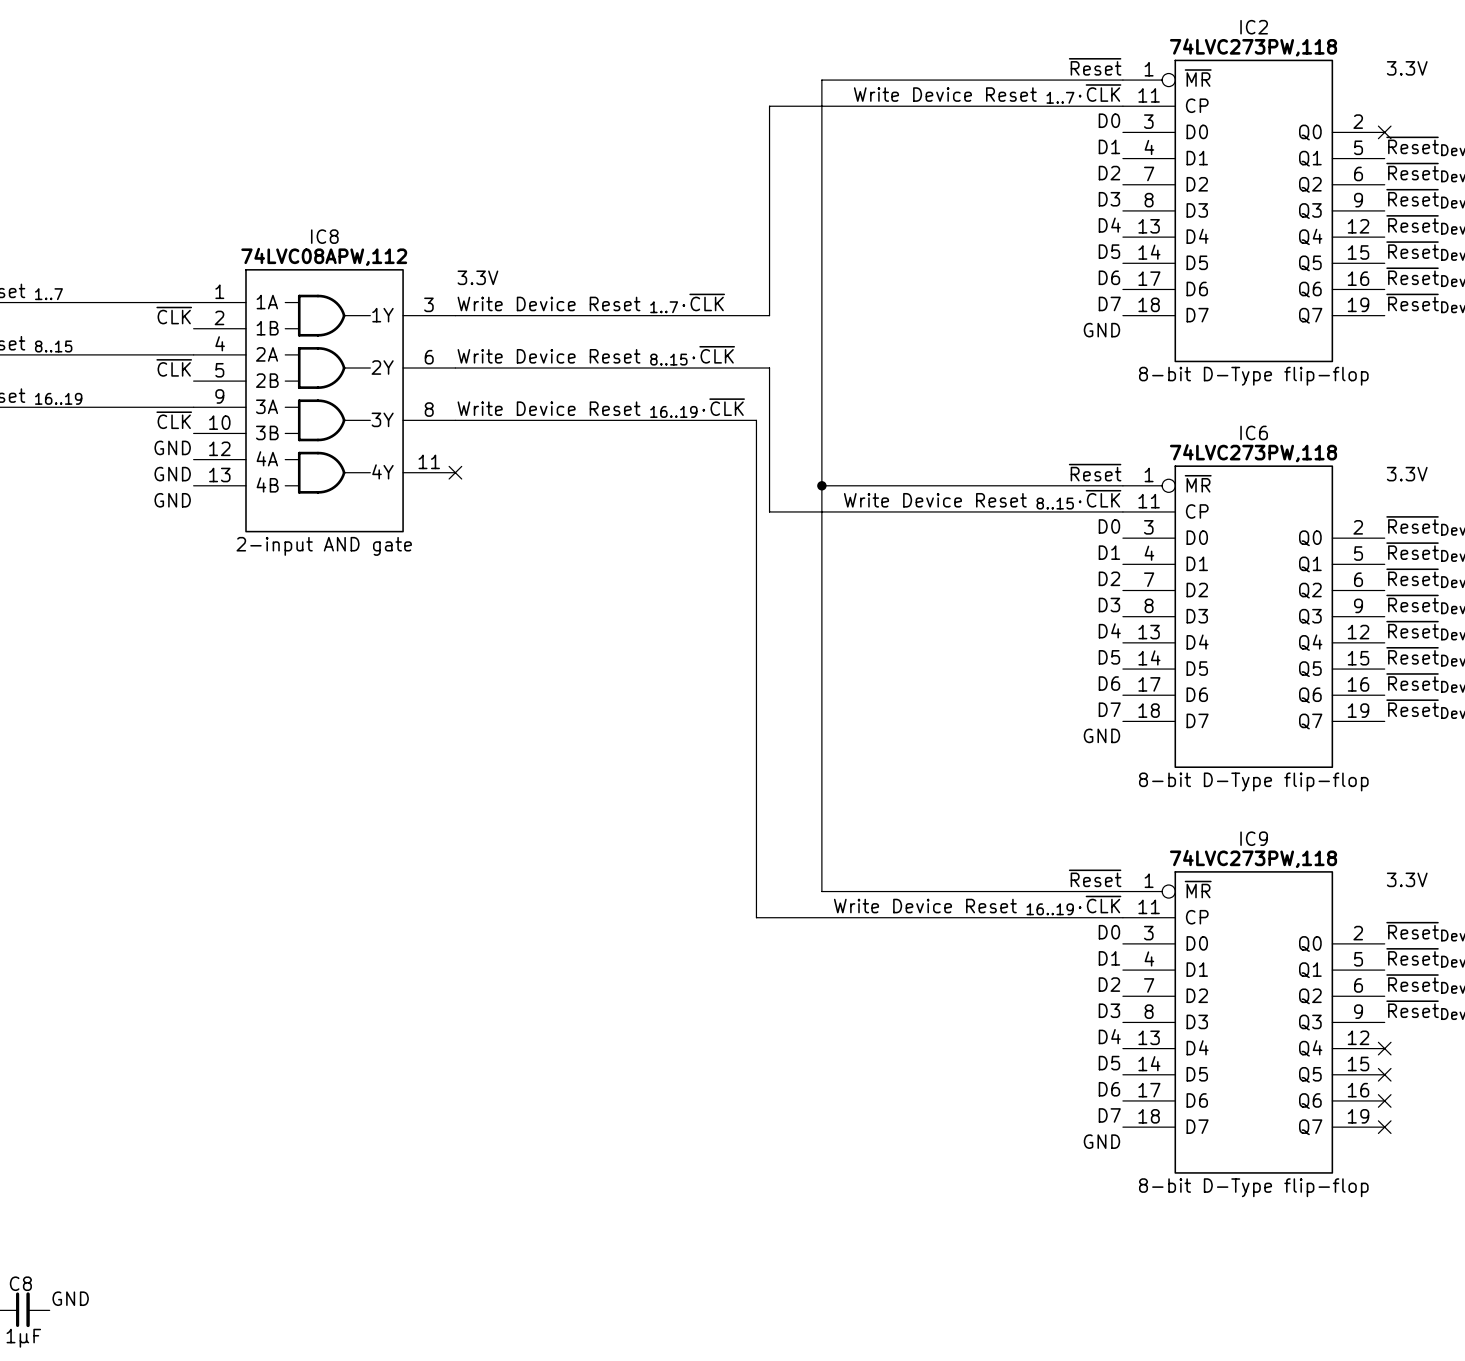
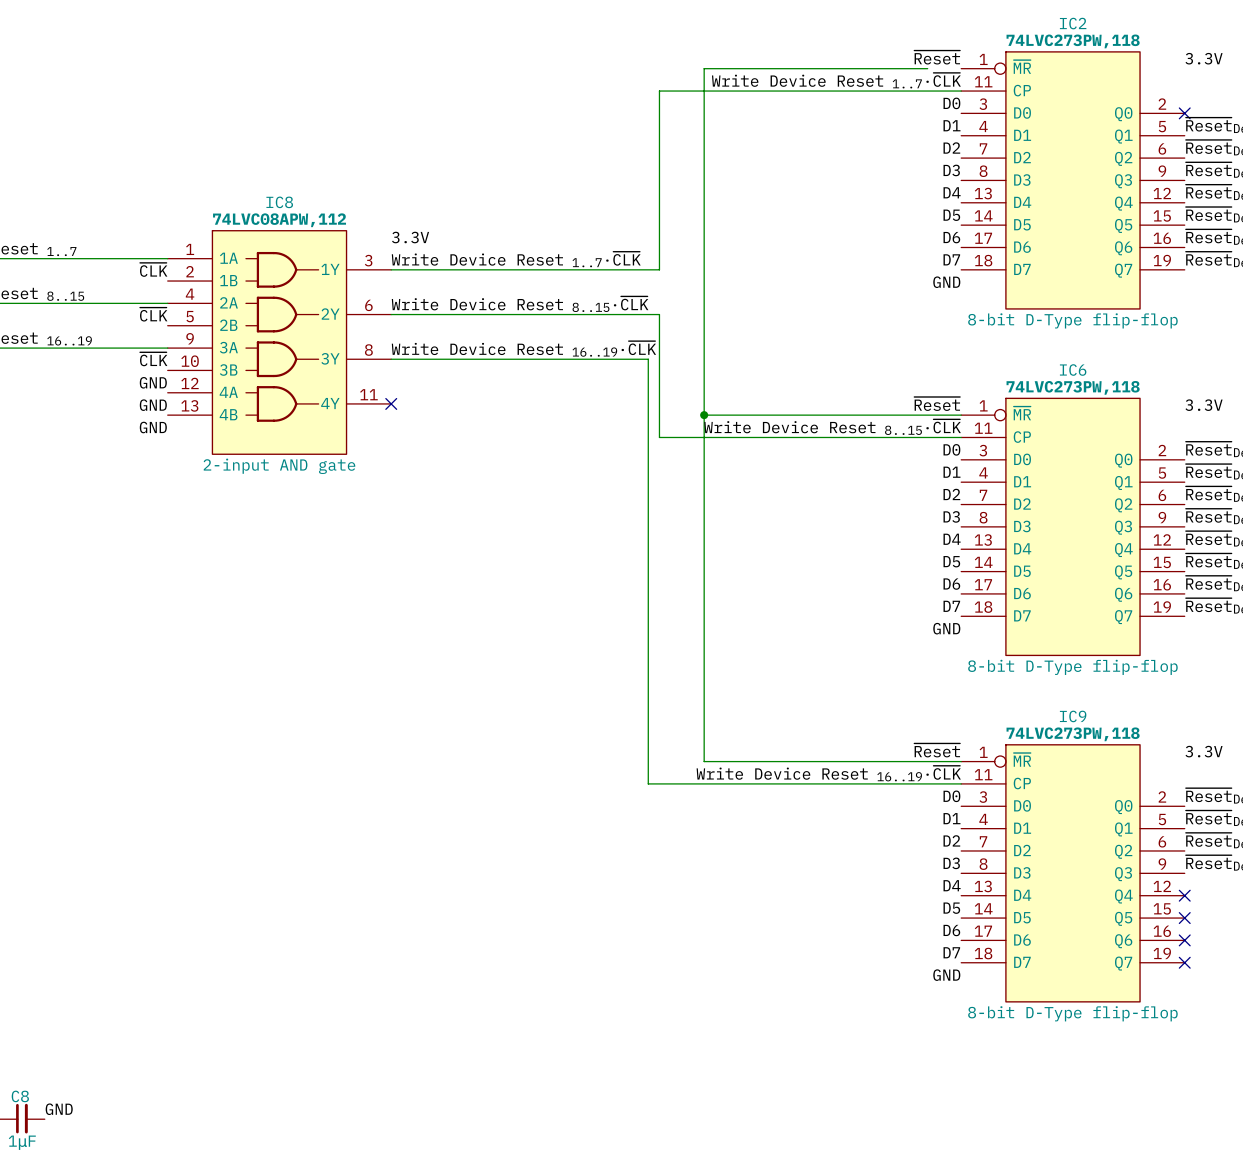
wire: (1083, 80) (1122, 80) -> none

